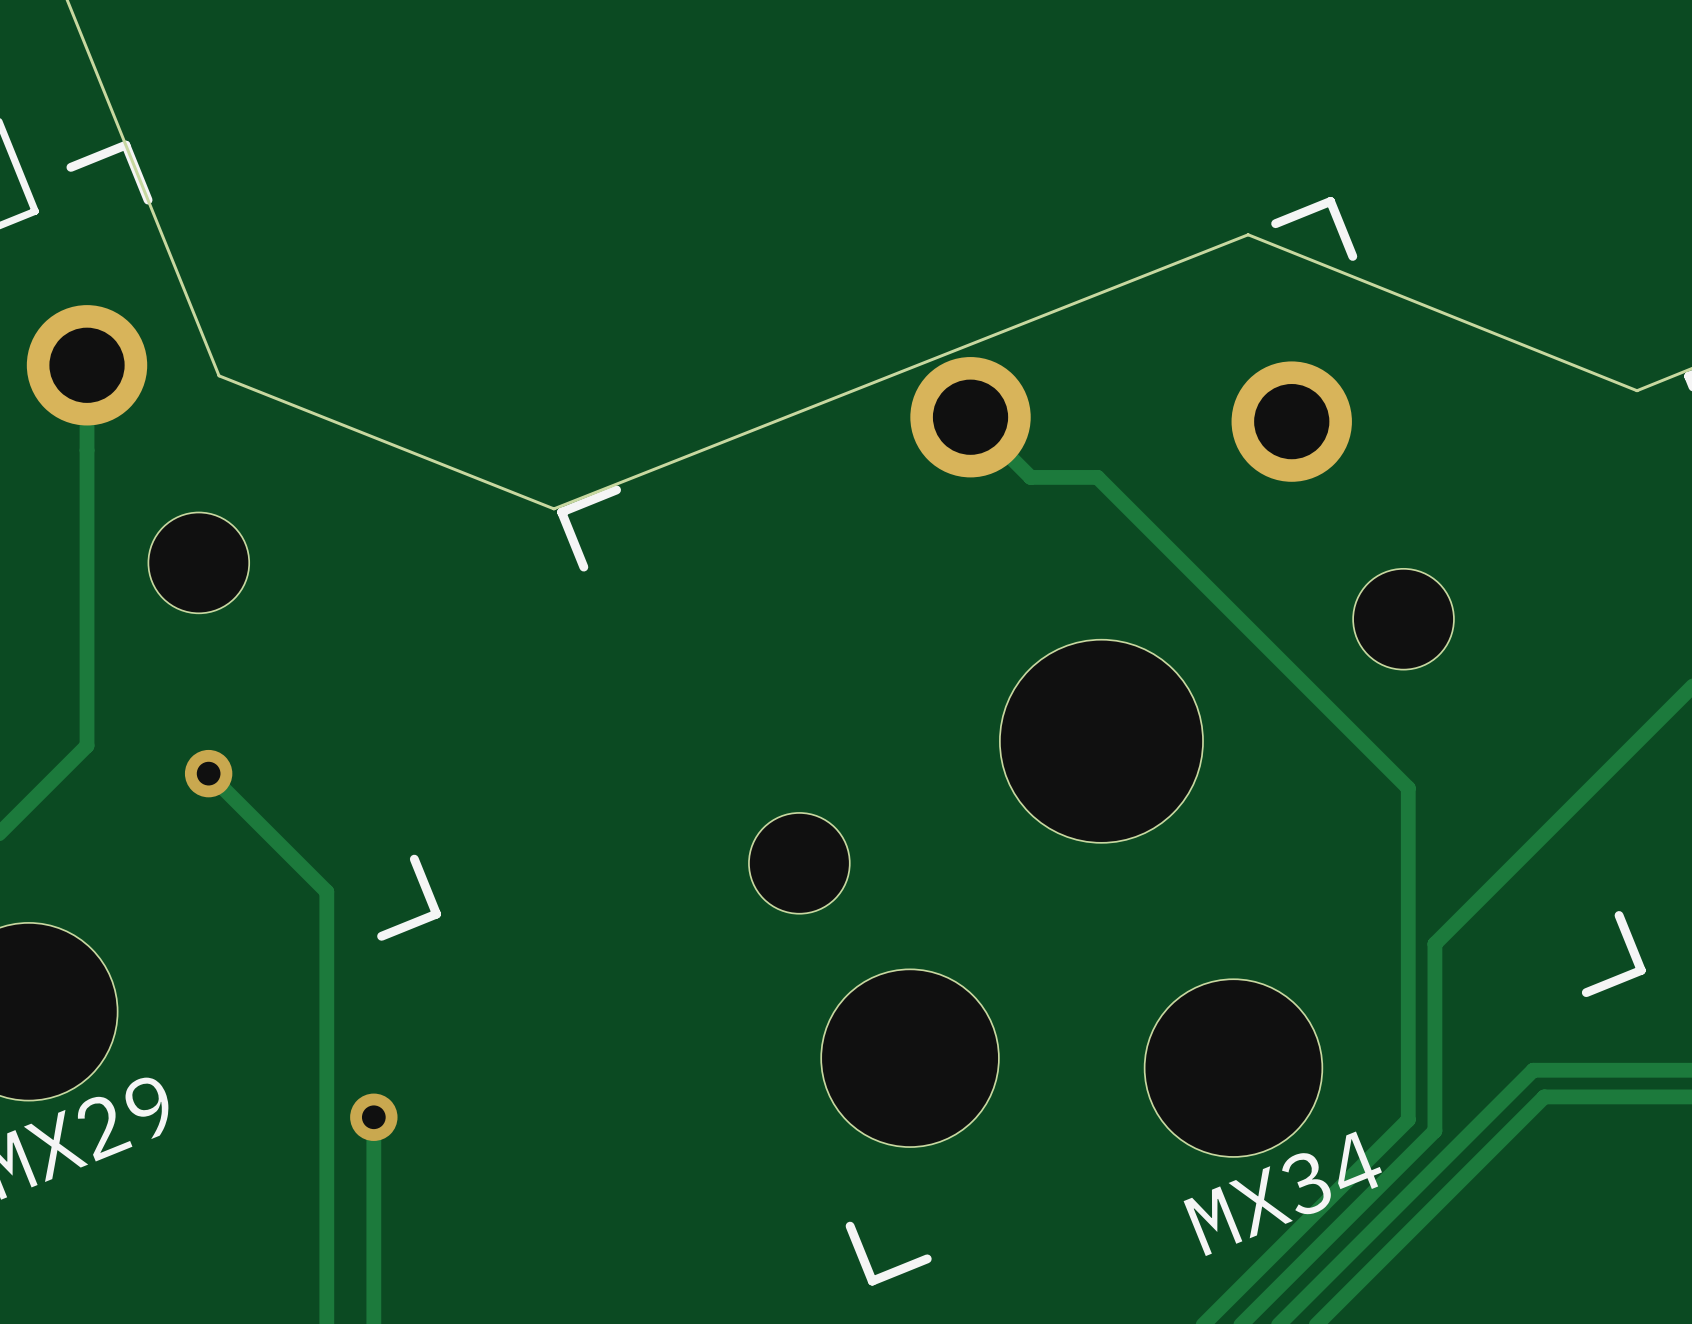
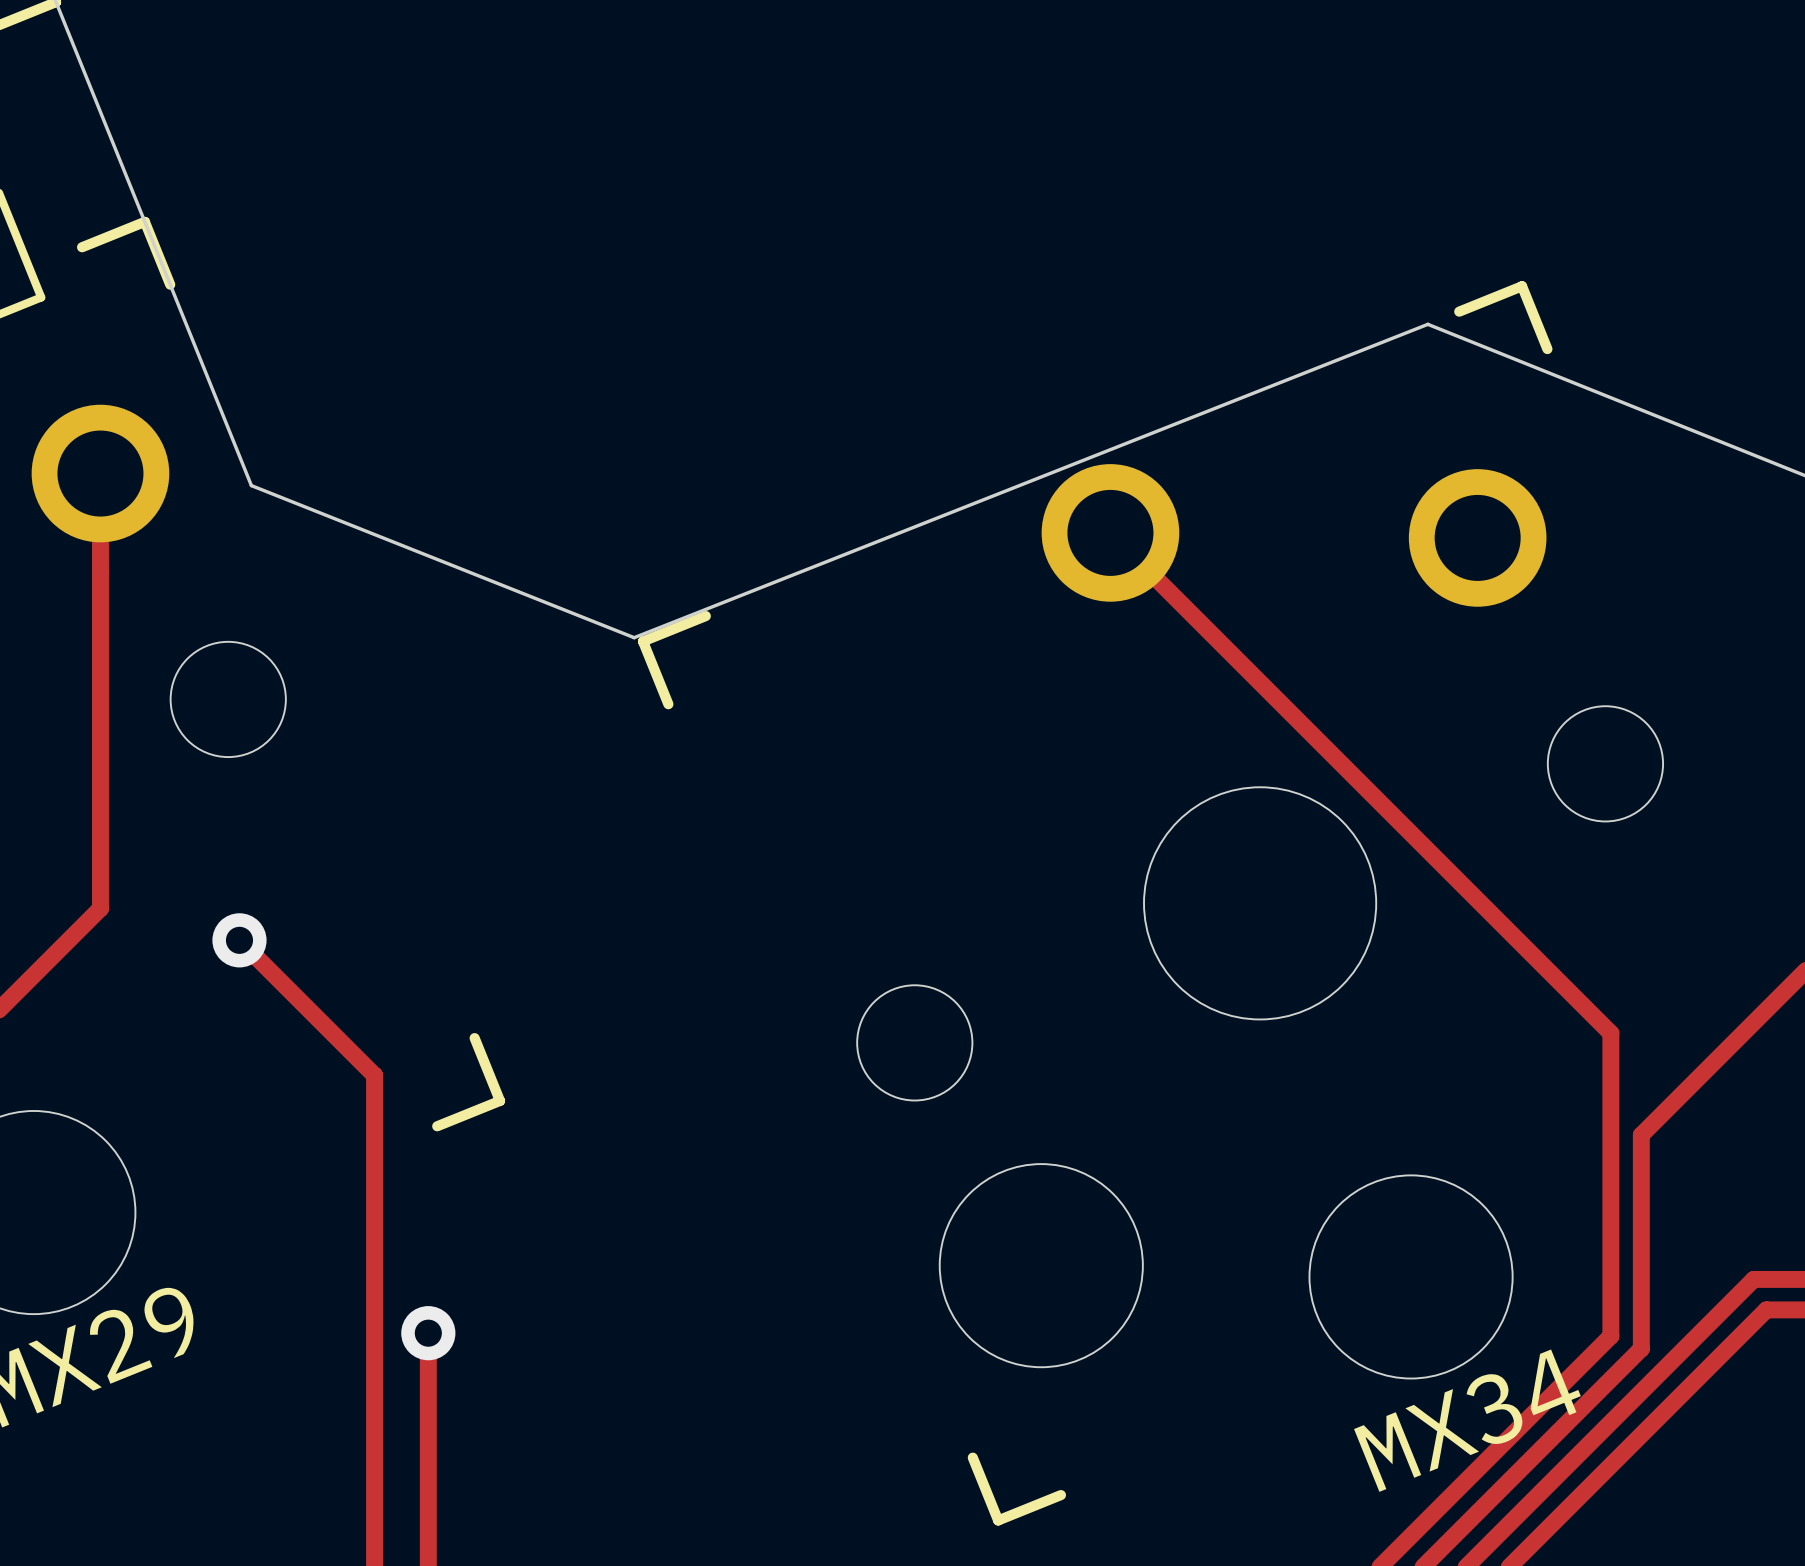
track: (1030, 477) (1097, 477) (1408, 788) (1408, 854) -> (1179, 601) (1610, 1033)

